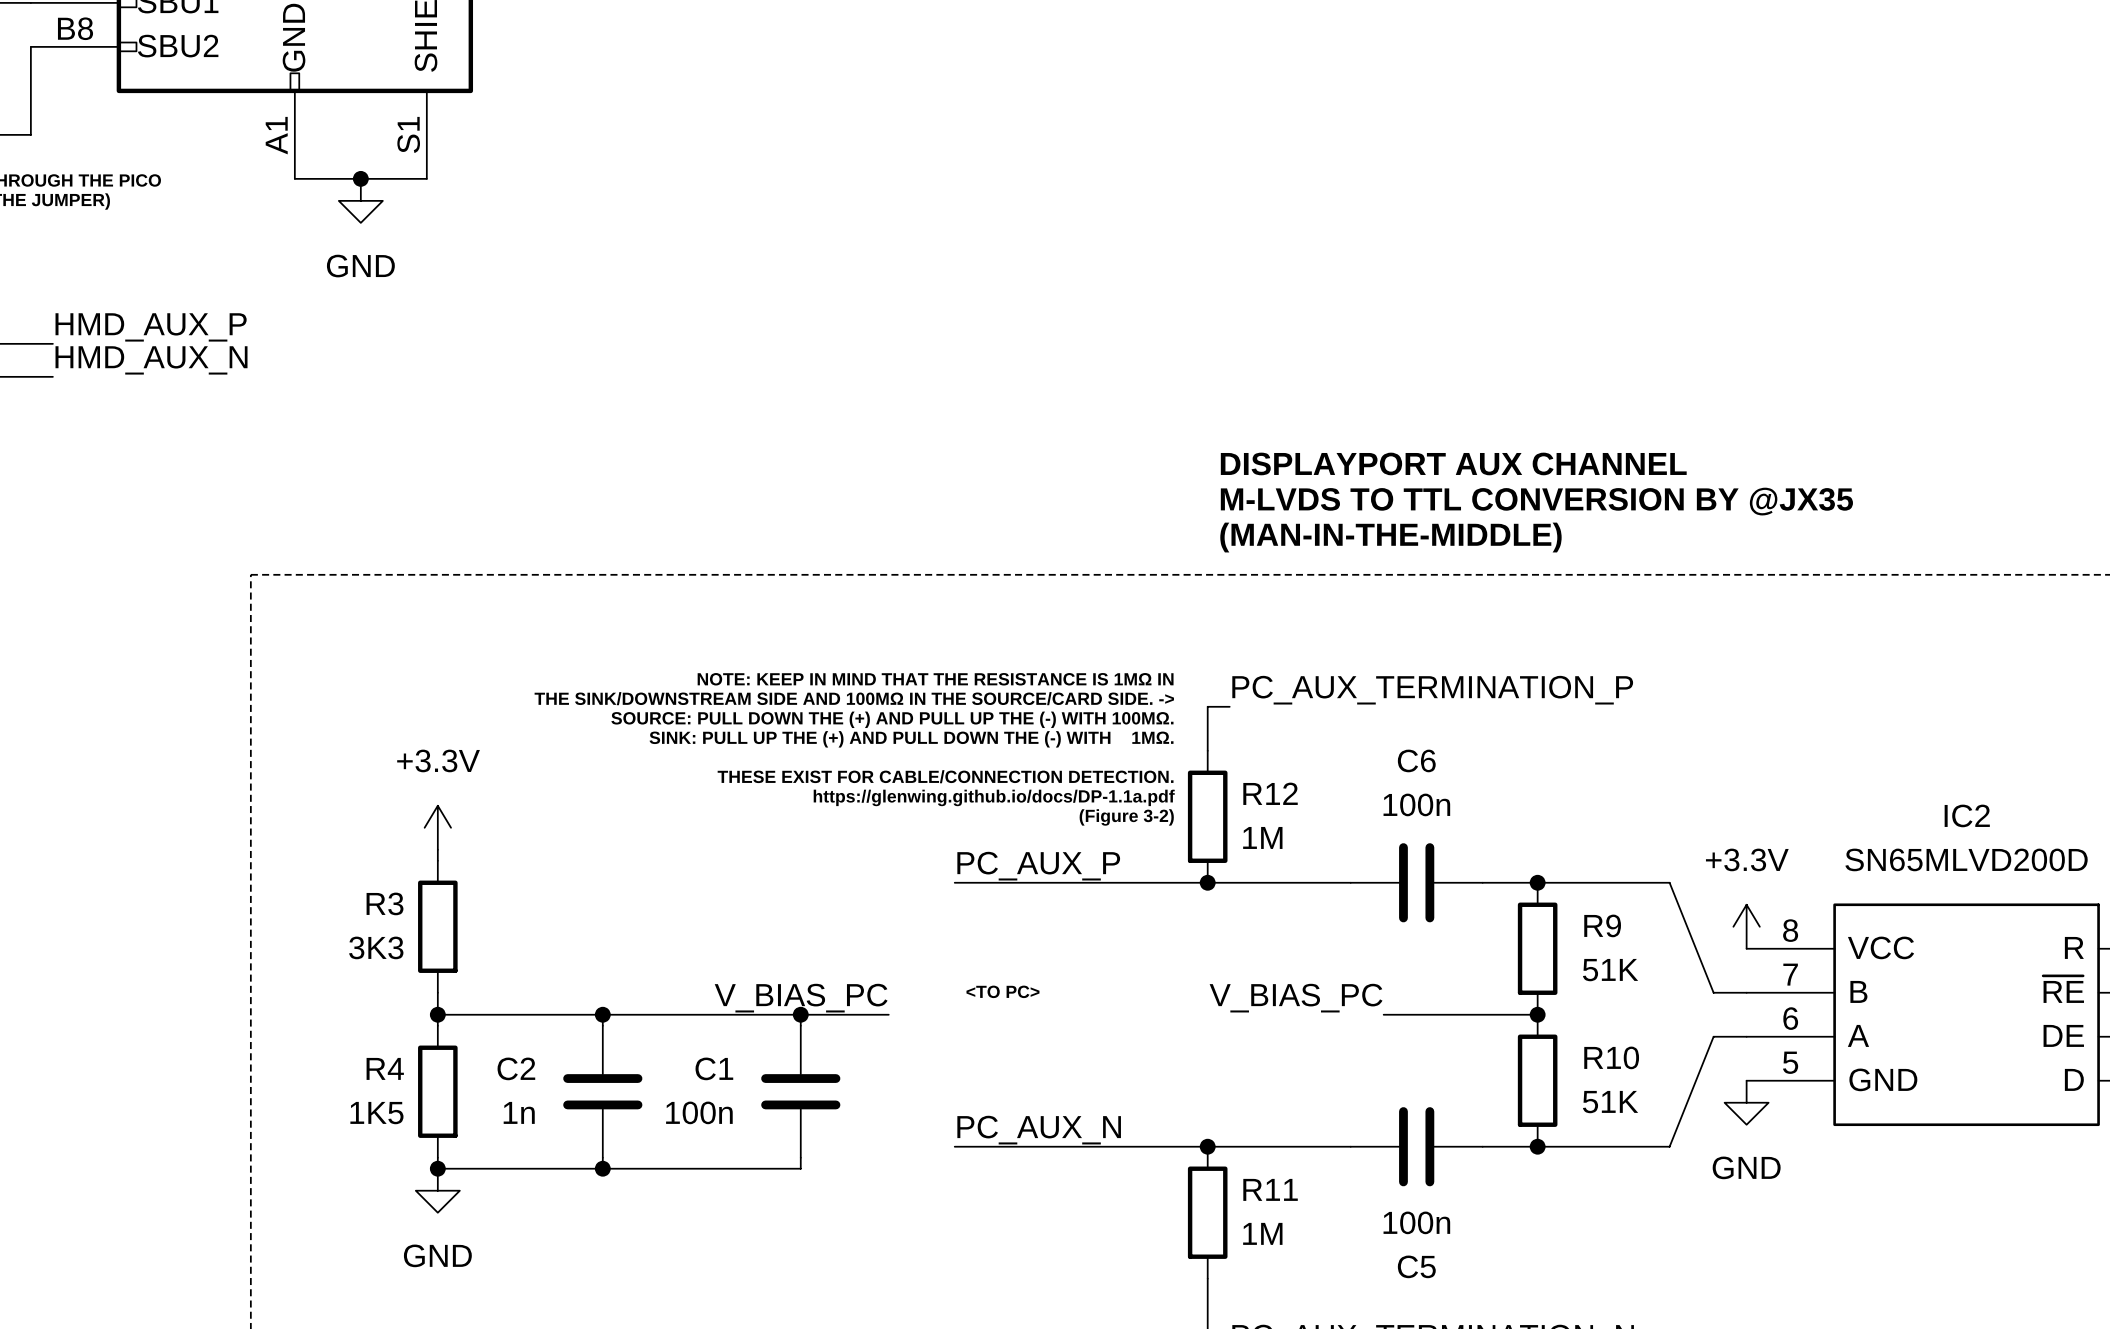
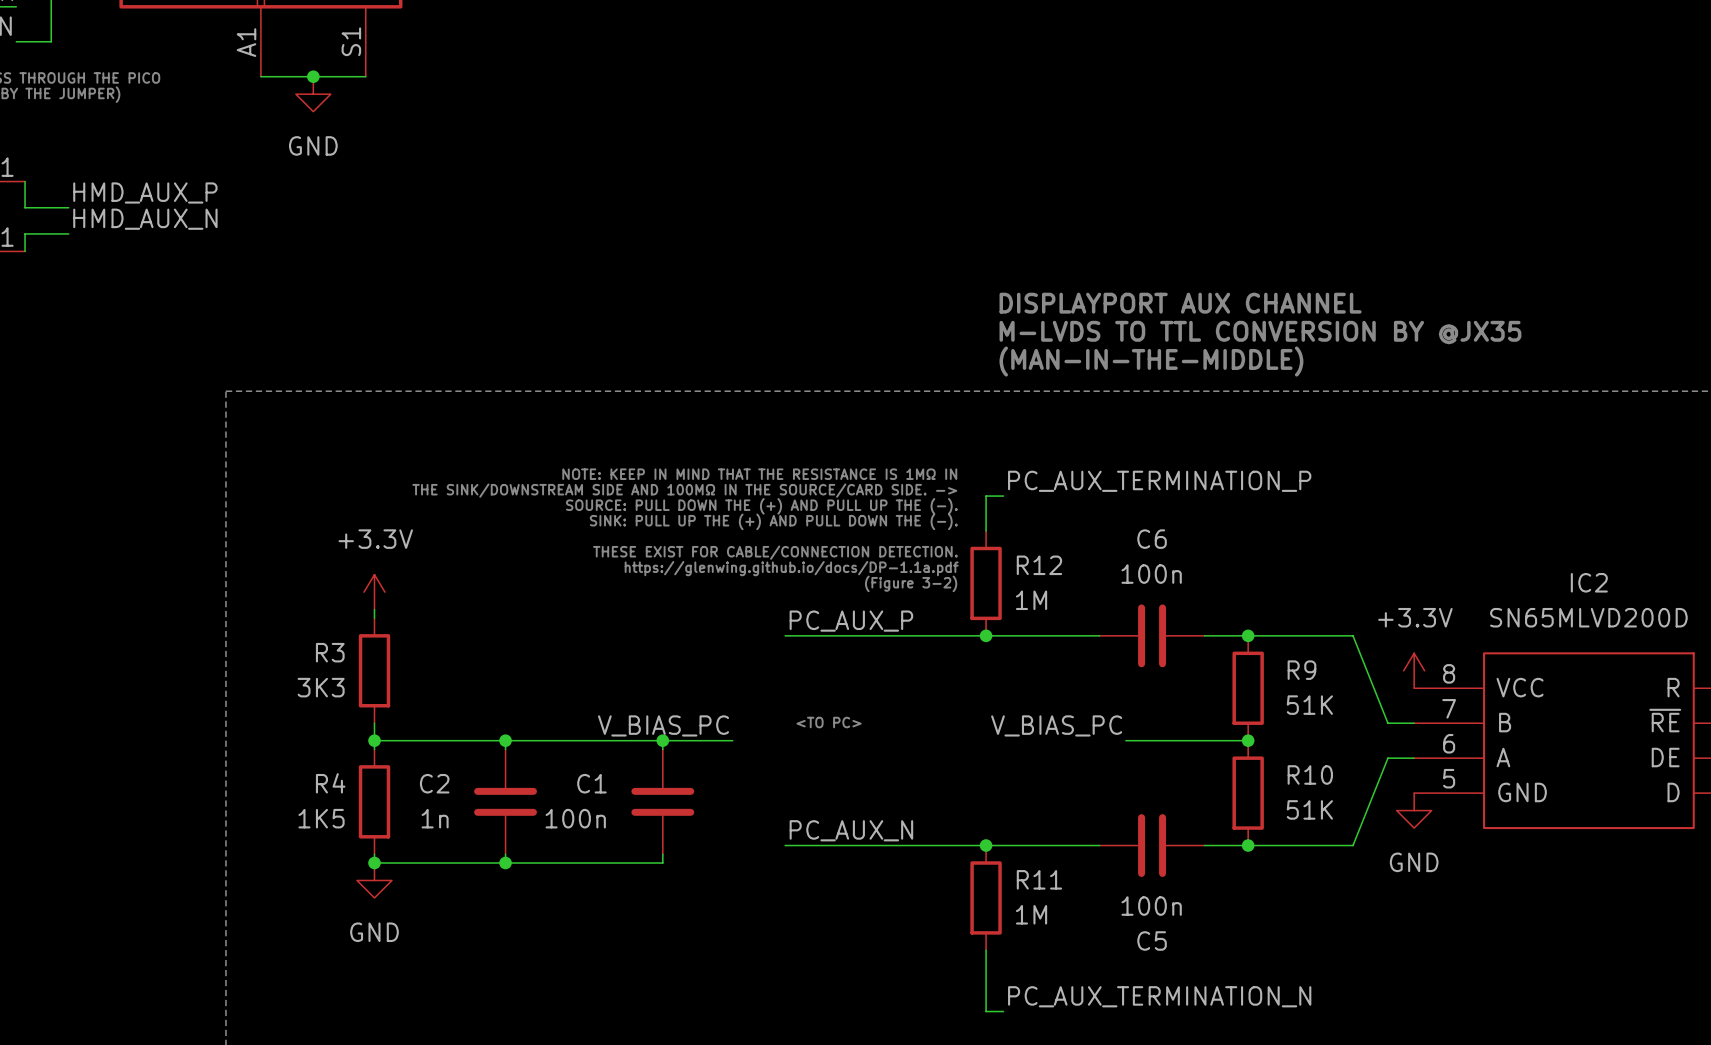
text: SOURCE: PULL DOWN THE (+) AND PULL UP THE (-) WITH 100MΩ. (892, 719) -> SOURCE: PULL DOWN THE (+) AND PULL UP THE (-). (761, 506)
text: SINK: PULL UP THE (+) AND PULL DOWN THE (-) WITH 1MΩ. (911, 739) -> SINK: PULL UP THE (+) AND PULL DOWN THE (-). (773, 521)

